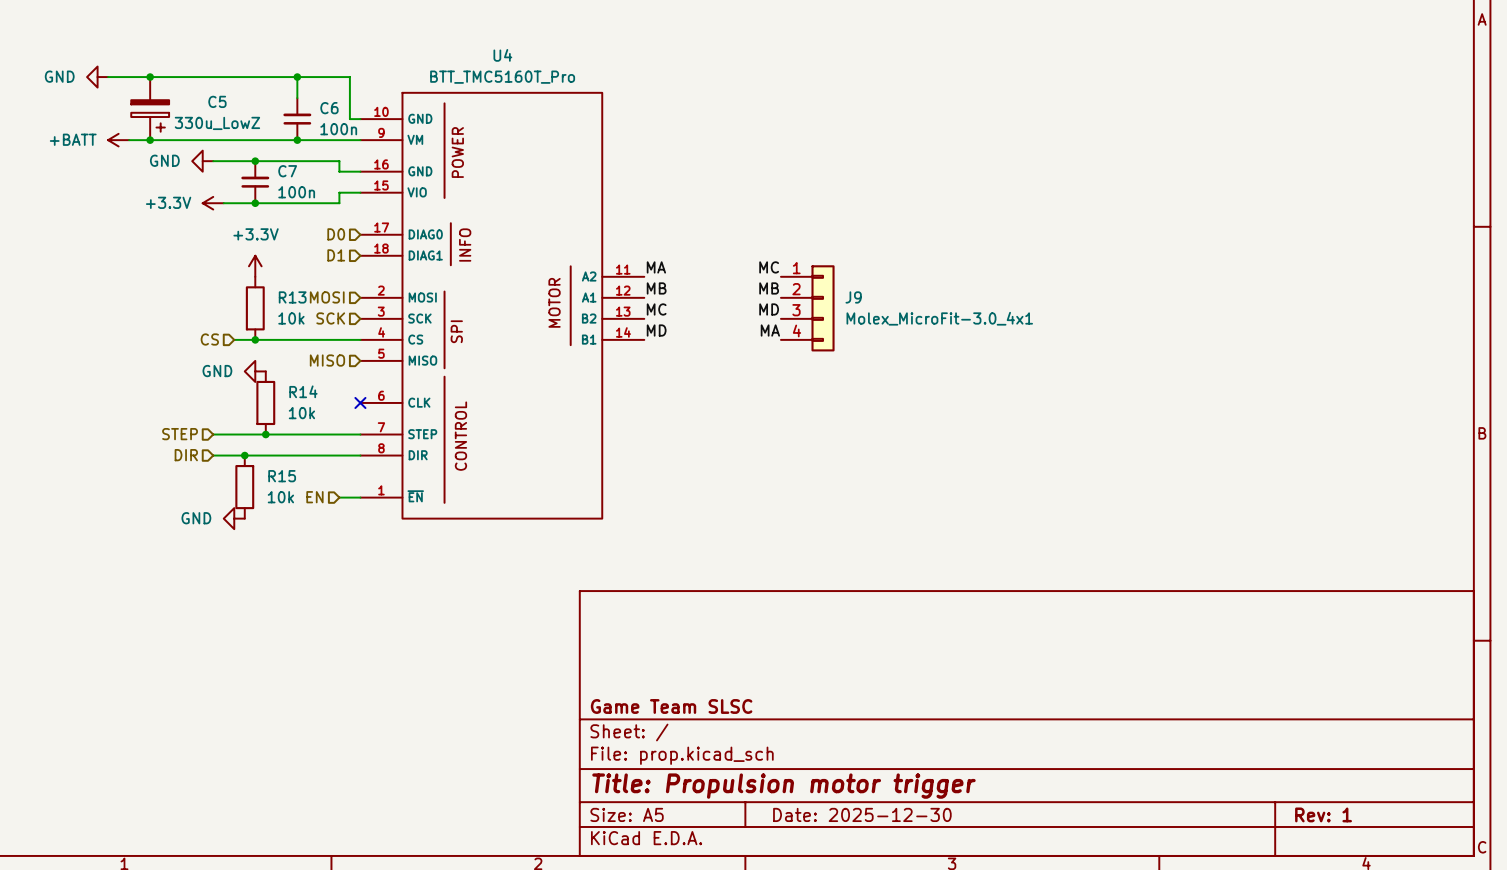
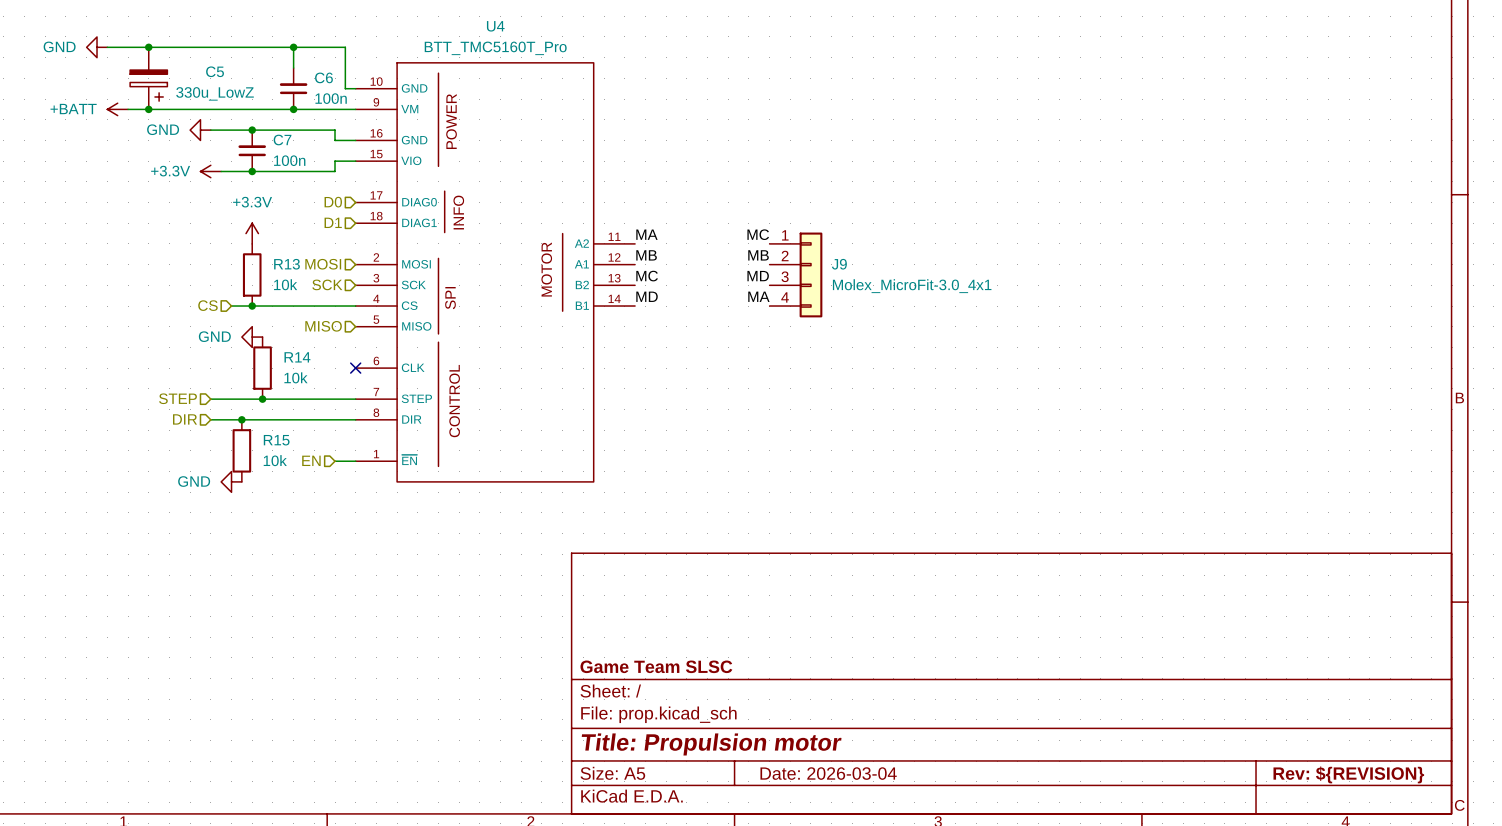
title block: Title: Propulsion motor trigger (783, 786) -> Title: Propulsion motor (711, 744)
title block: Date: 2025-12-30 (862, 814) -> Date: 2026-03-04 (828, 773)
title block: Rev: 1 (1323, 814) -> Rev: ${REVISION} (1348, 774)

